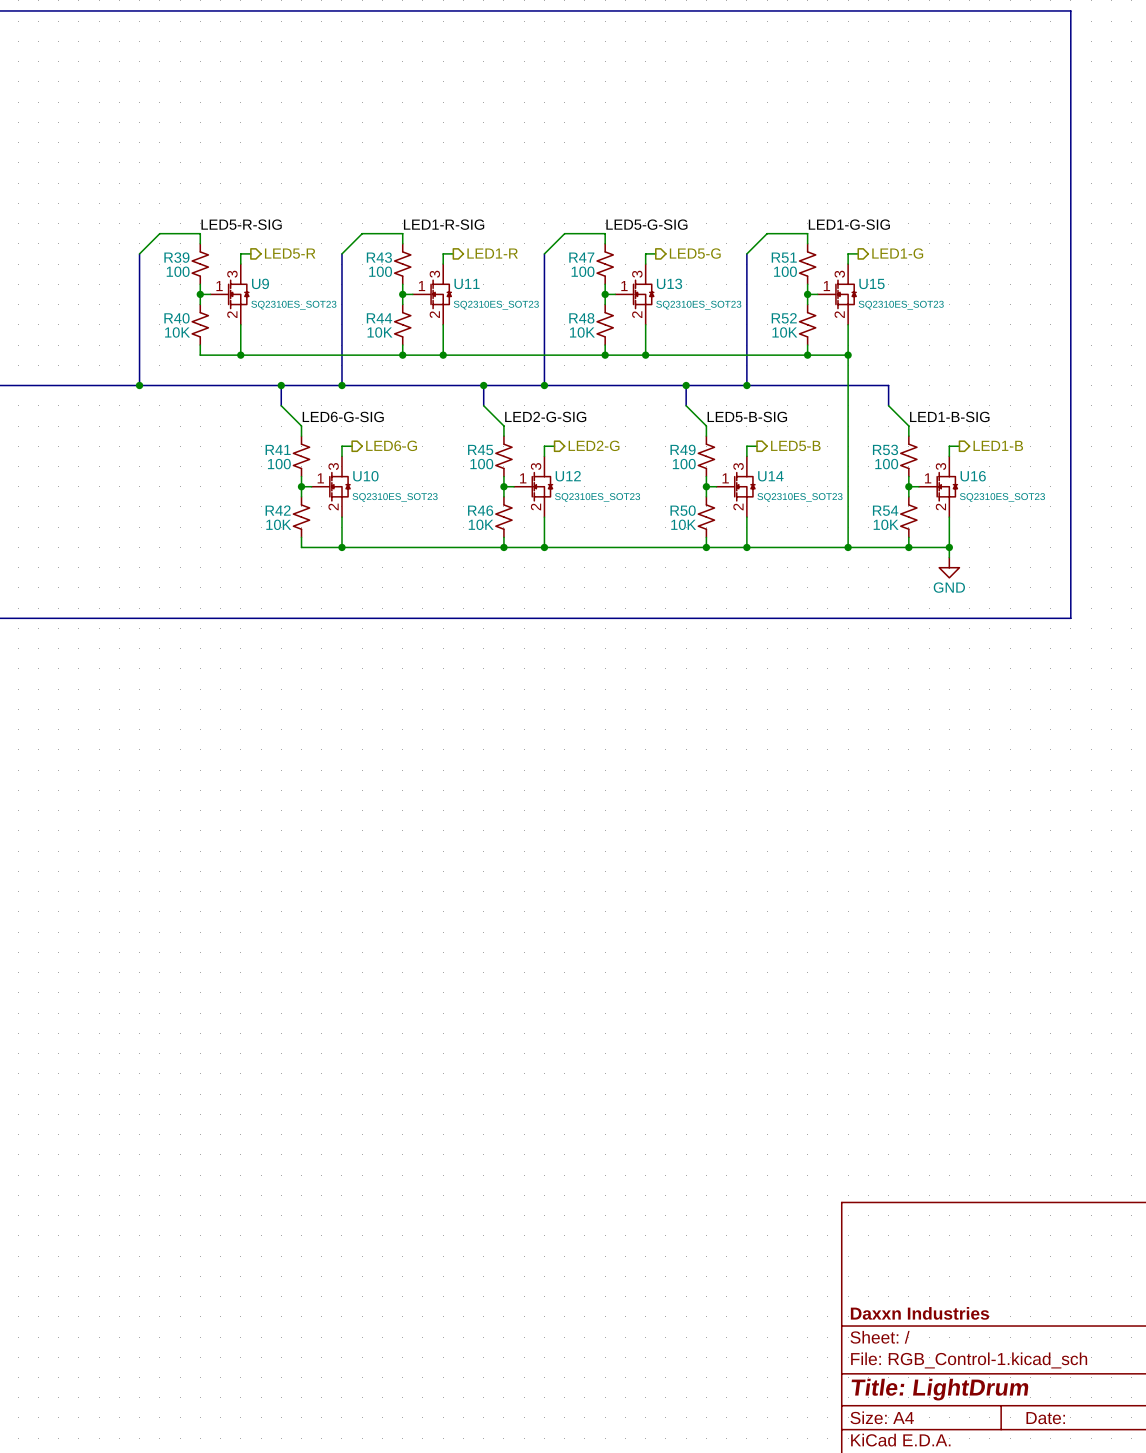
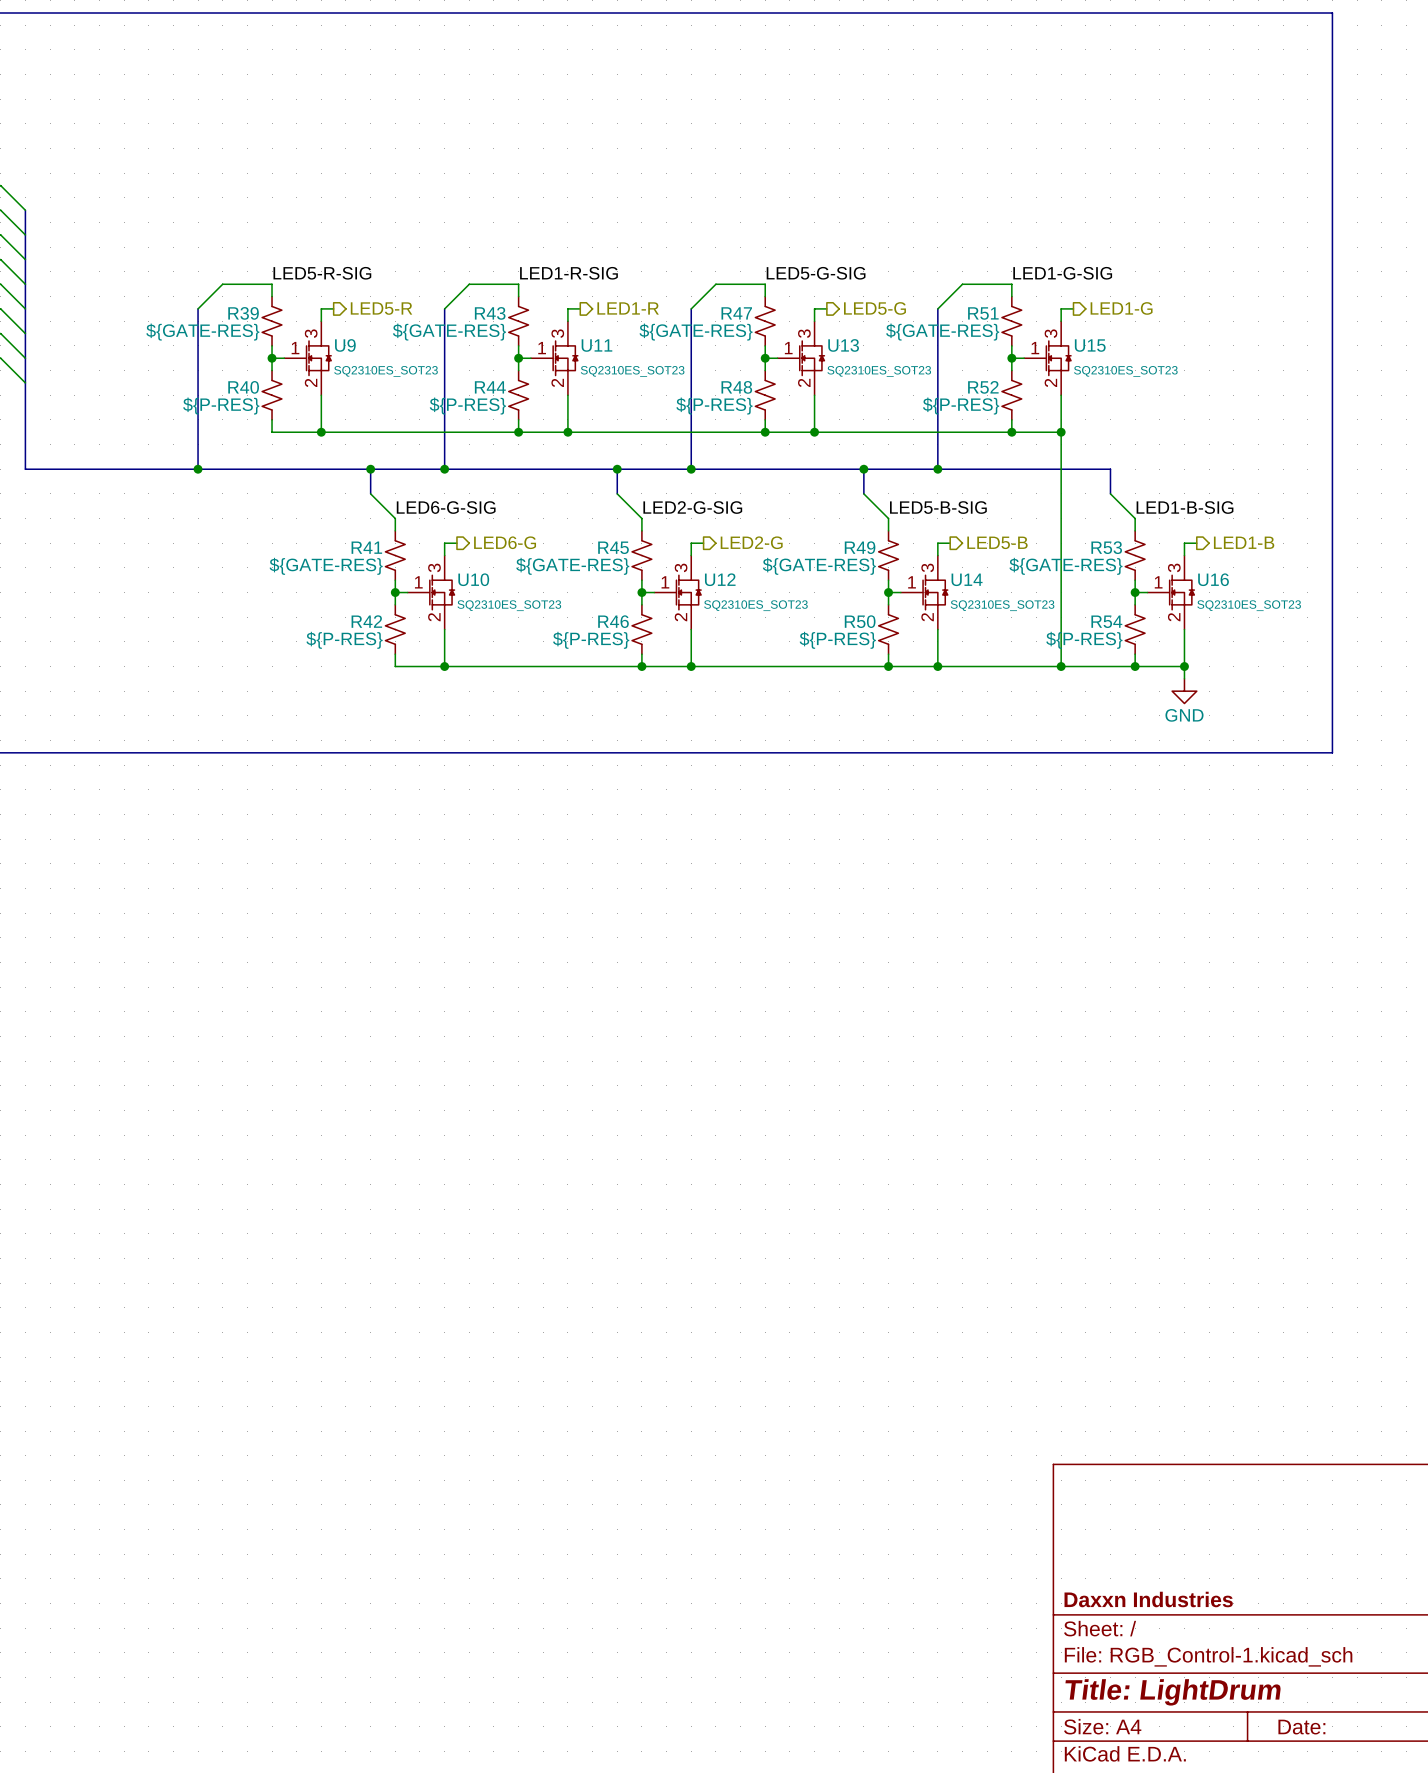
R39 value: 100 (178, 271) -> ${GATE-RES} (202, 332)
R43 value: 100 (380, 271) -> ${GATE-RES} (449, 332)
R47 value: 100 (583, 271) -> ${GATE-RES} (696, 332)
R51 value: 100 (785, 271) -> ${GATE-RES} (942, 332)
R40 value: 10K (177, 332) -> ${P-RES} (221, 406)
R44 value: 10K (379, 332) -> ${P-RES} (467, 406)
R48 value: 10K (582, 332) -> ${P-RES} (714, 406)
R52 value: 10K (784, 332) -> ${P-RES} (961, 406)
R41 value: 100 (279, 464) -> ${GATE-RES} (326, 566)
R45 value: 100 (481, 464) -> ${GATE-RES} (572, 566)
R49 value: 100 (684, 464) -> ${GATE-RES} (819, 566)
R53 value: 100 (886, 464) -> ${GATE-RES} (1065, 566)
R42 value: 10K (278, 524) -> ${P-RES} (344, 640)
R46 value: 10K (481, 524) -> ${P-RES} (591, 640)
R50 value: 10K (683, 524) -> ${P-RES} (837, 640)
R54 value: 10K (886, 524) -> ${P-RES} (1084, 640)

